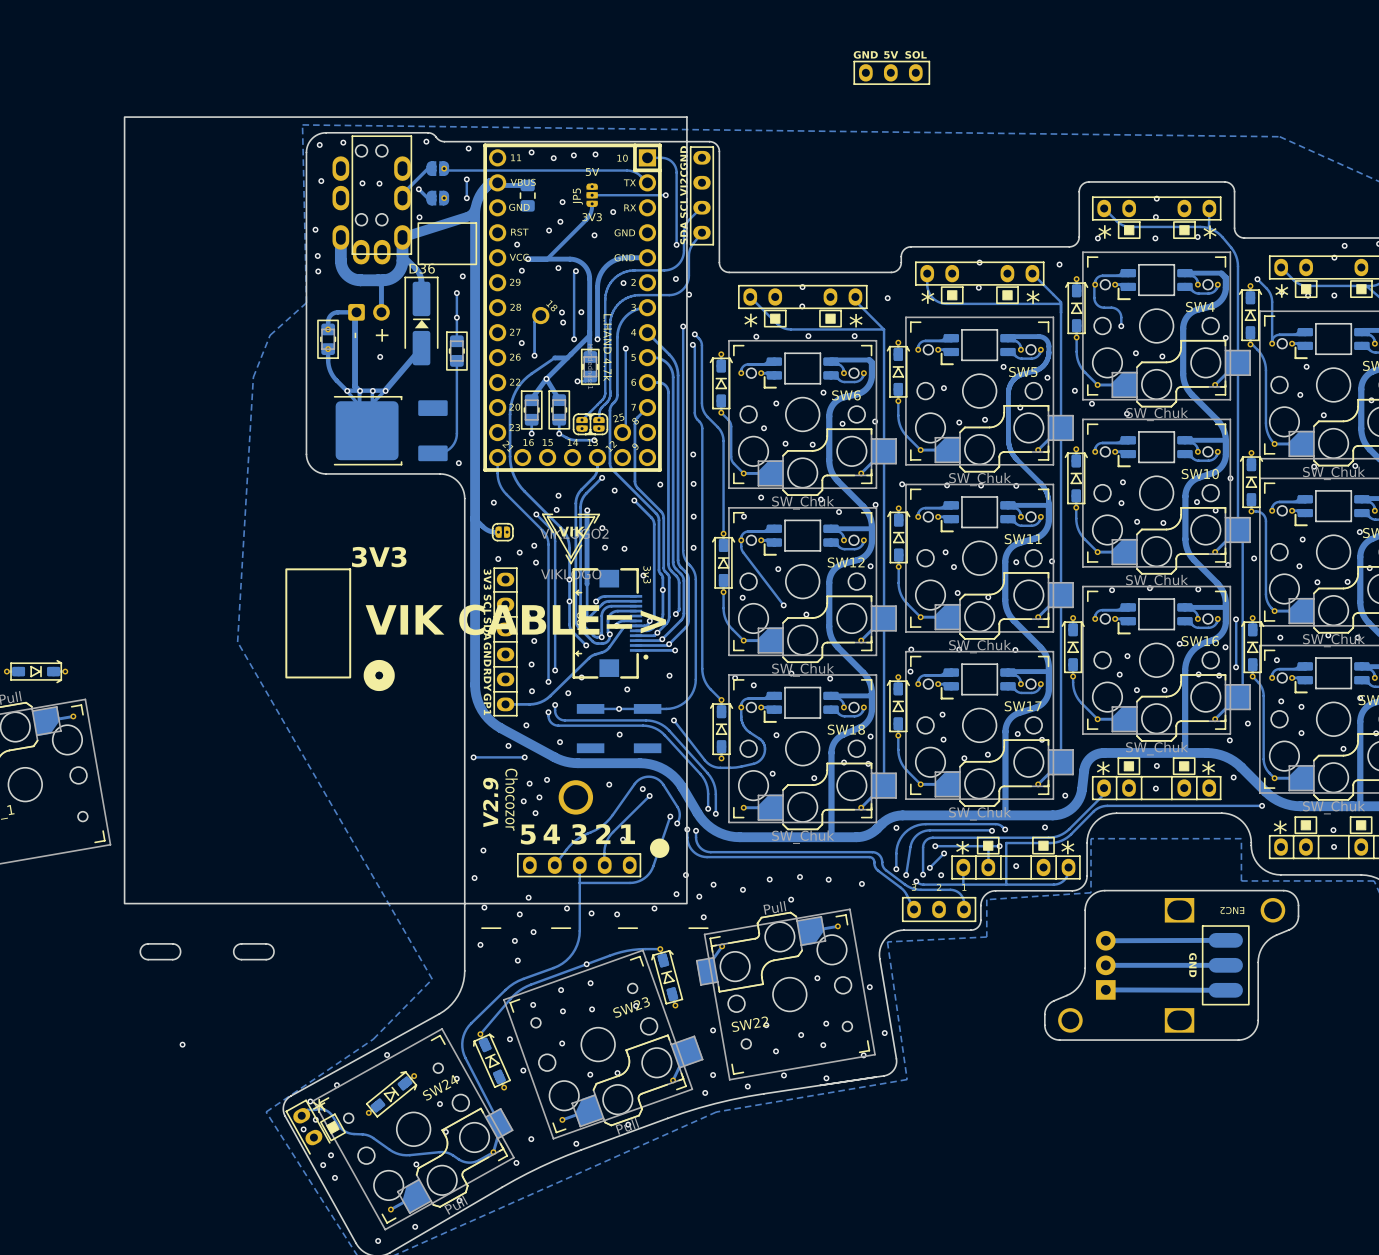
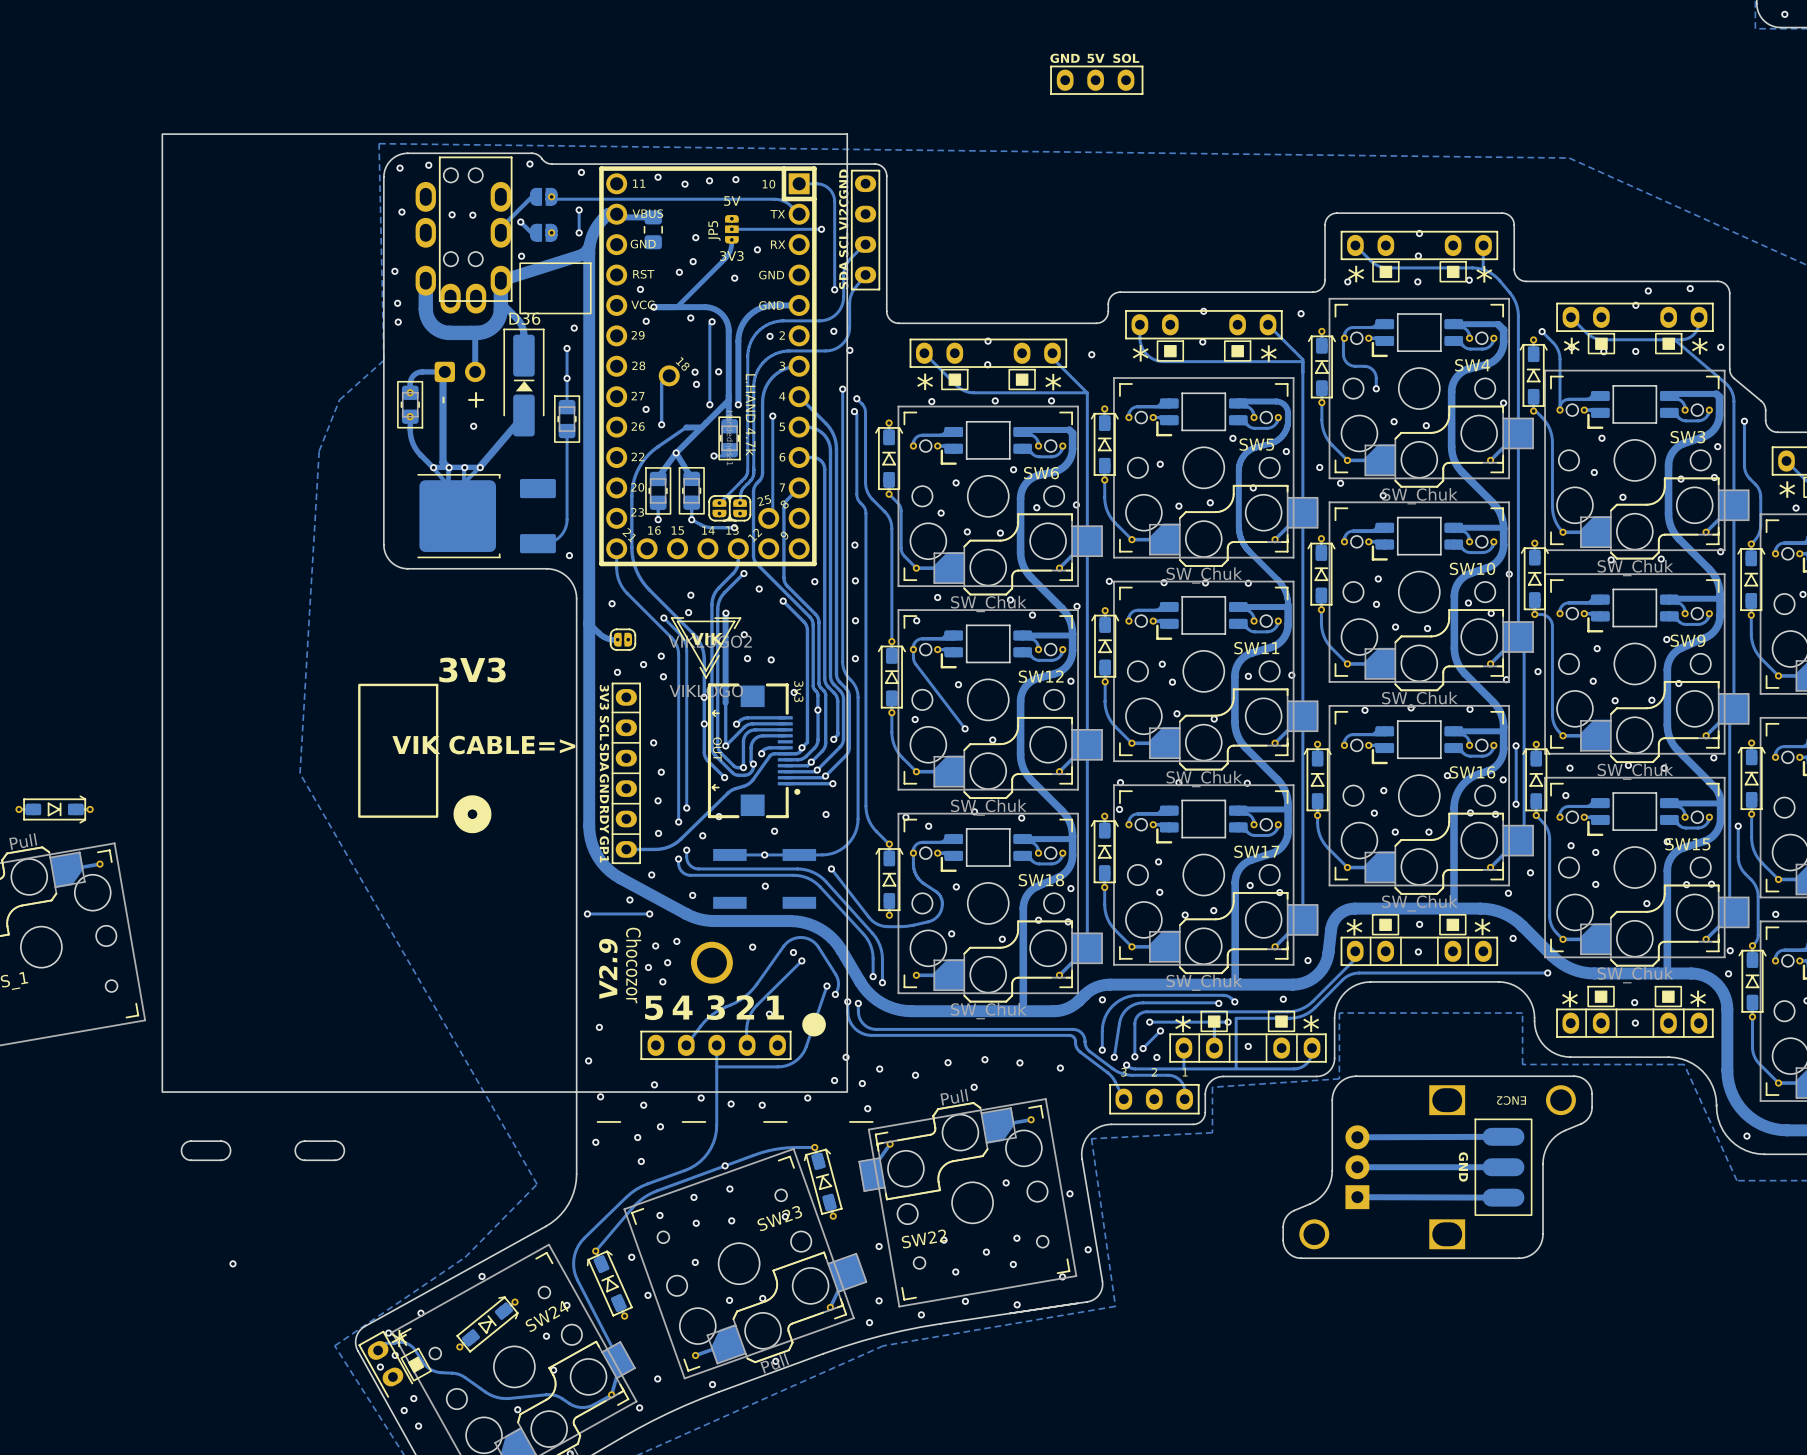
drawing shape: [124, 116, 688, 904] -> [162, 133, 848, 1093]

